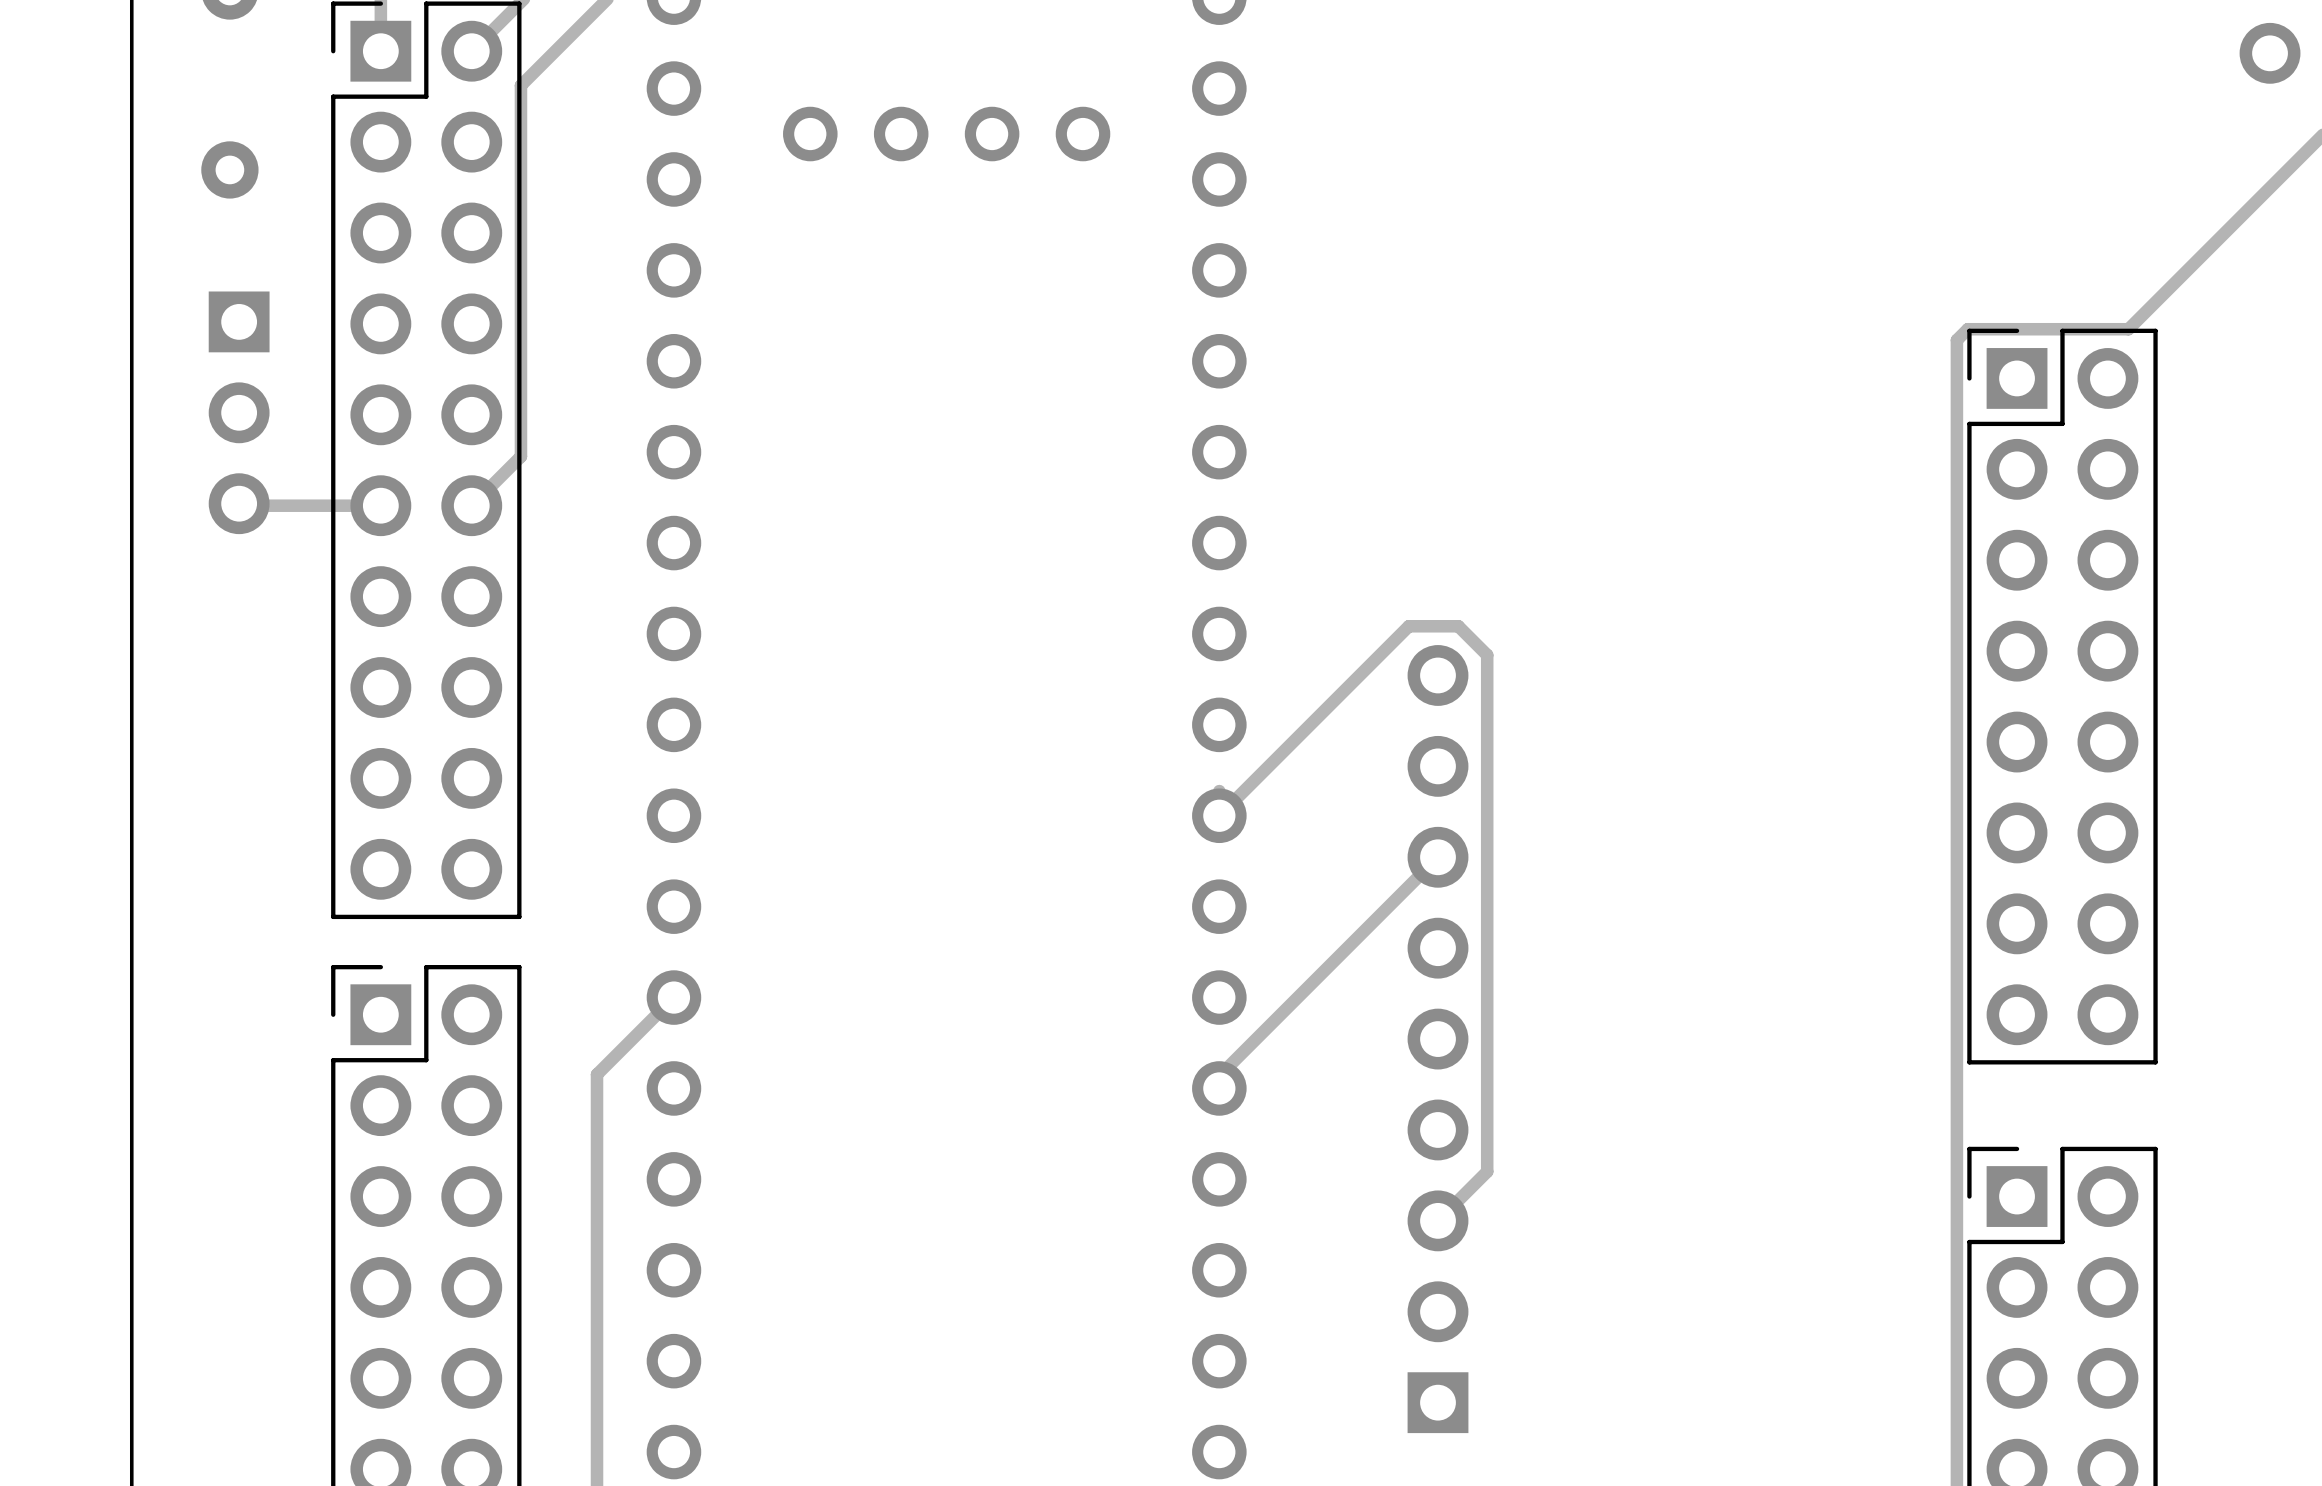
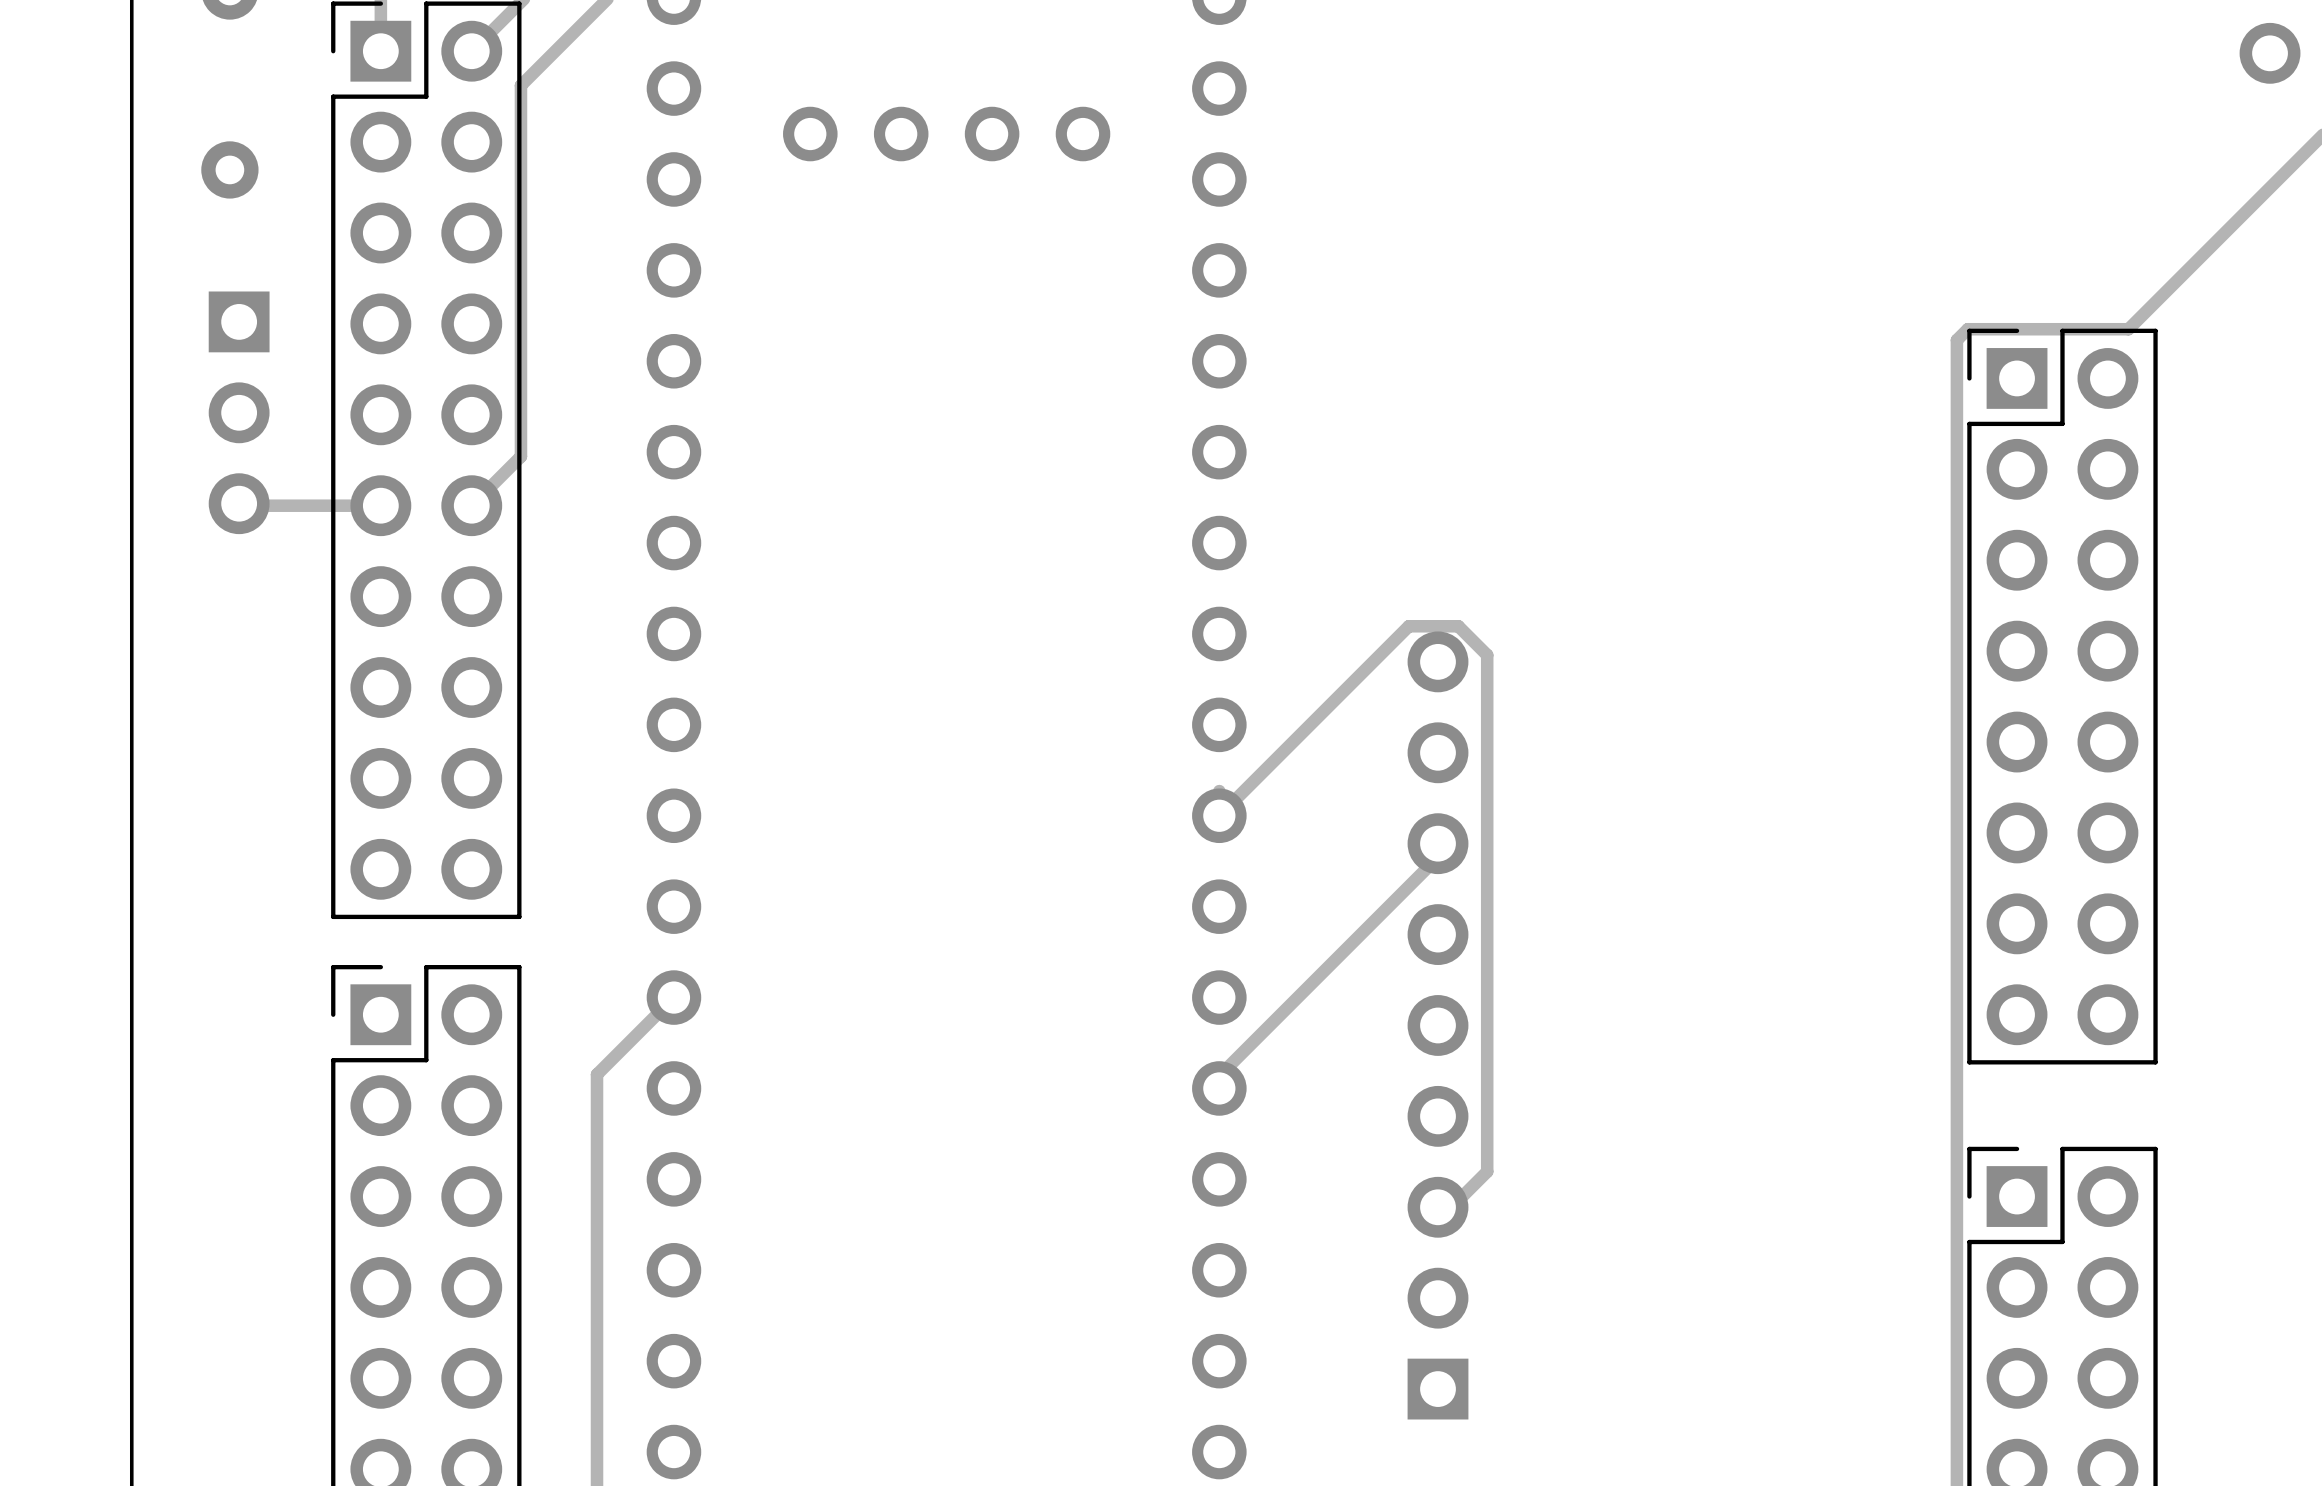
part position: (1438, 1039) -> (1438, 1025)

